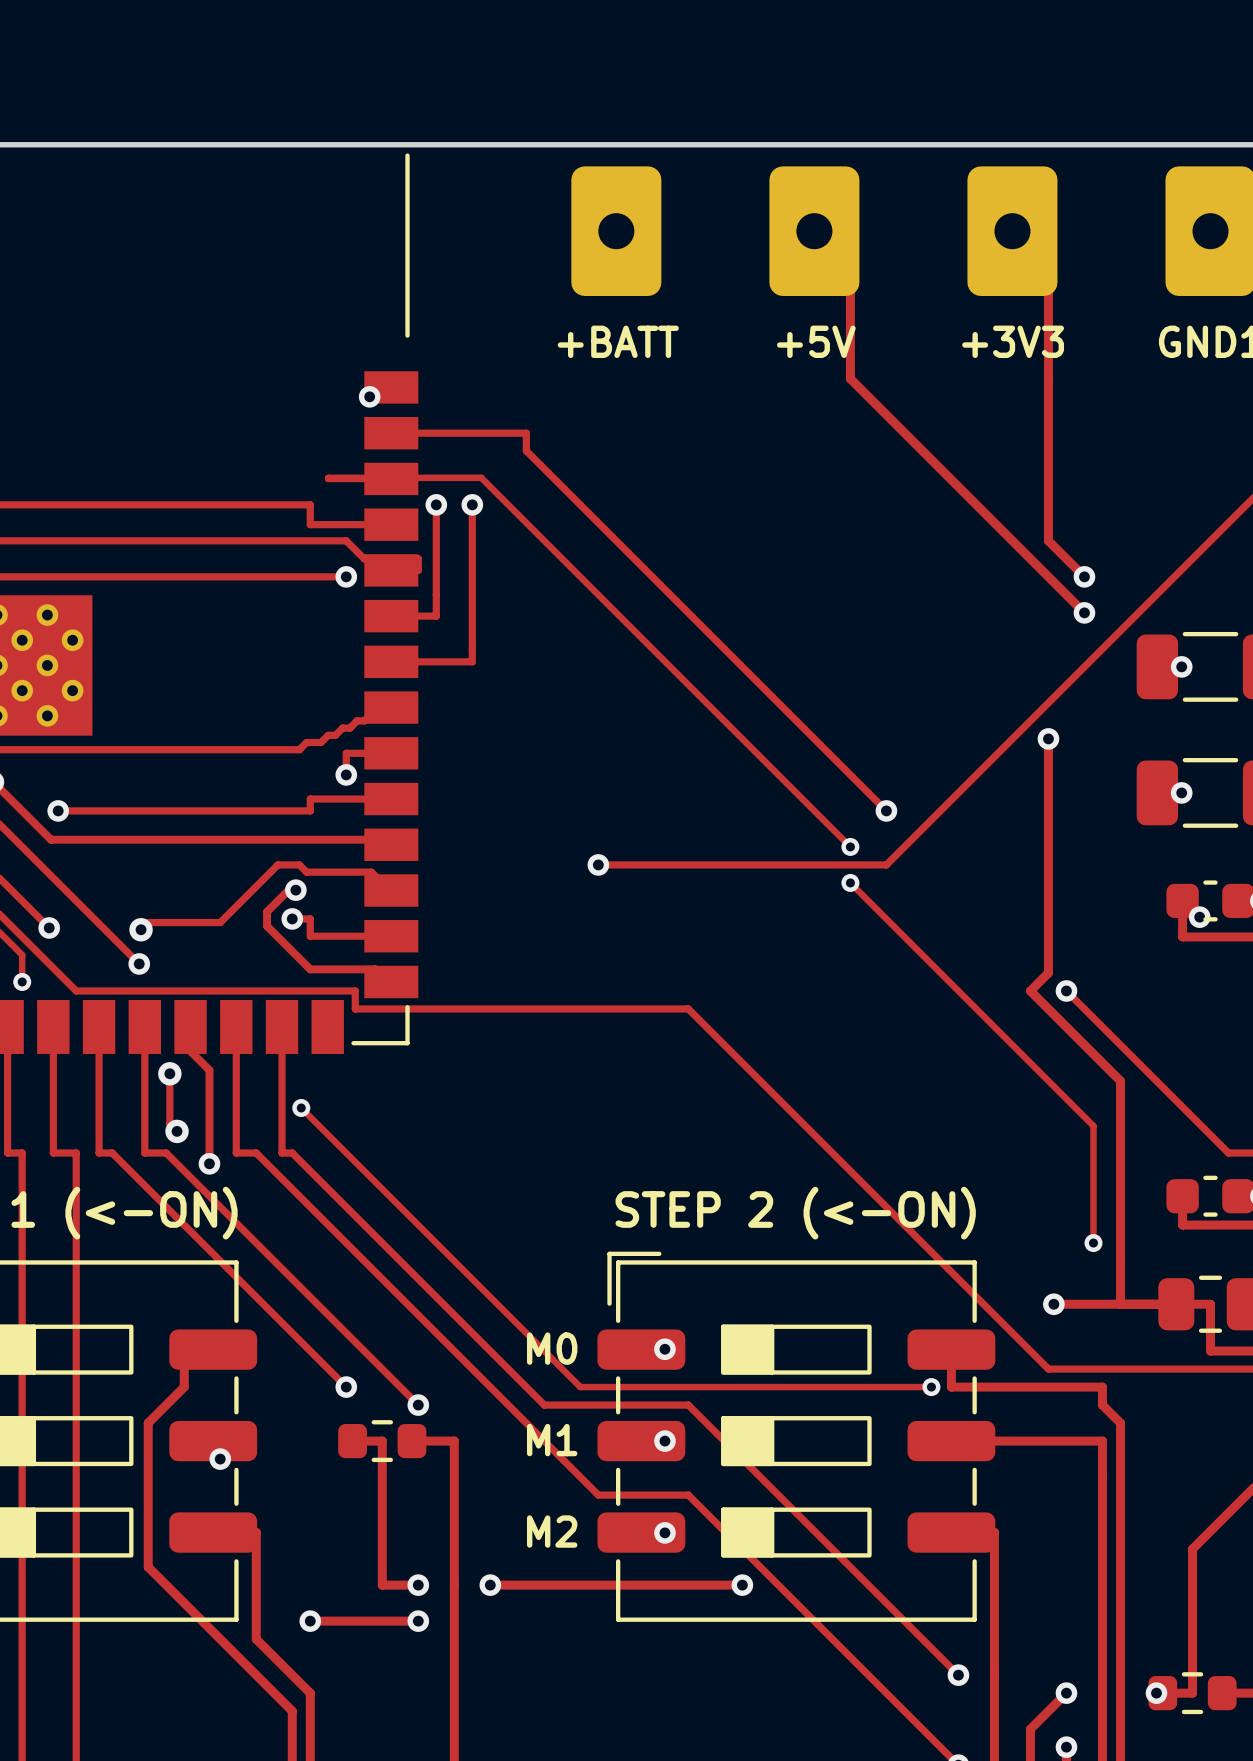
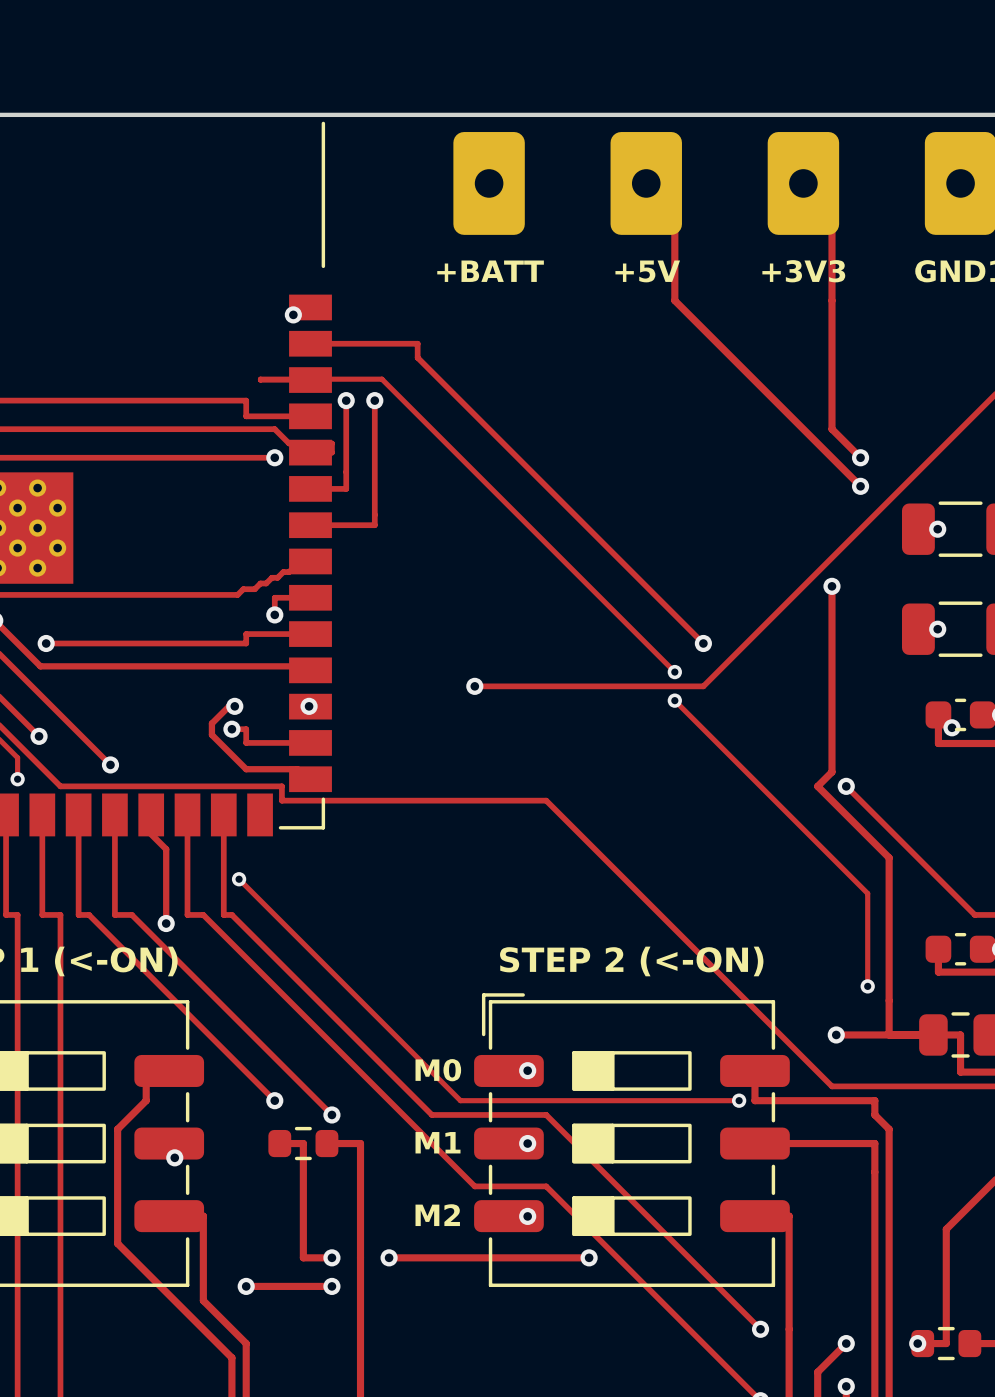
via: none -> (309, 706)
track: (391, 890) (393, 893) (371, 872) (306, 872) (299, 864) (277, 864) (220, 922) (148, 922) (141, 929) -> none
via: (141, 929) -> none
track: (169, 1073) (169, 1124) (177, 1131) -> none
via: (169, 1073) -> none
via: (177, 1131) -> none

